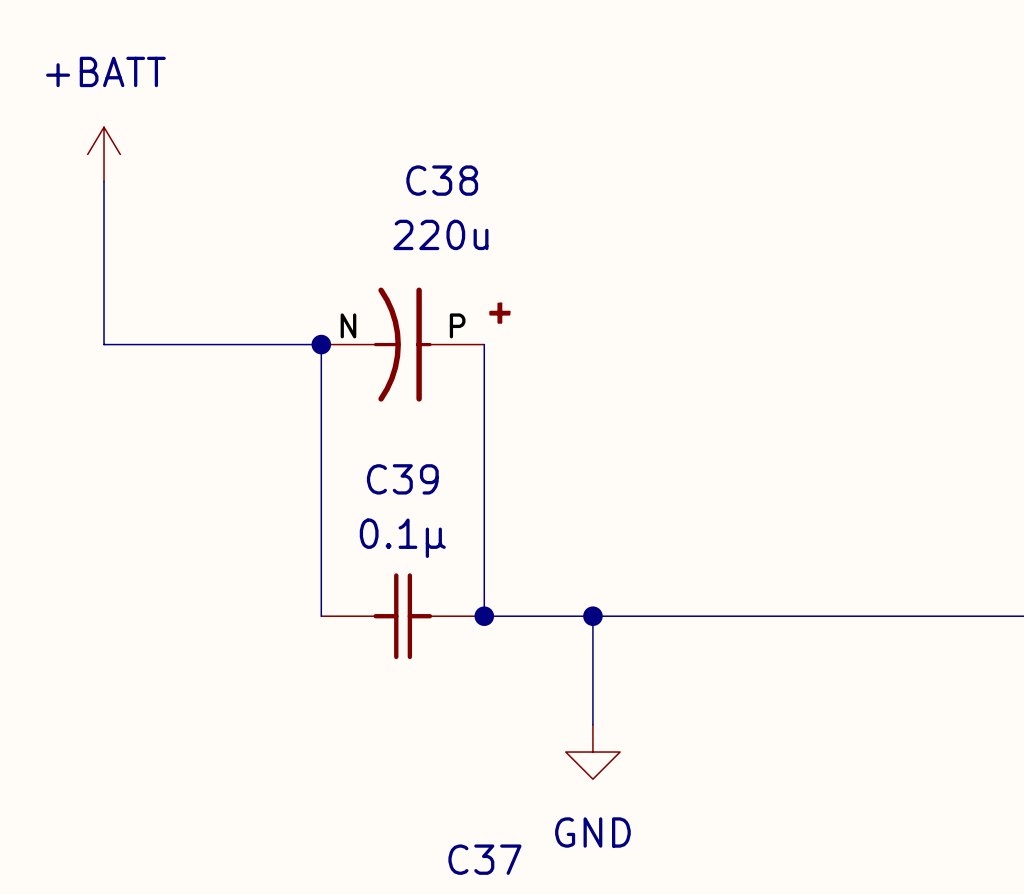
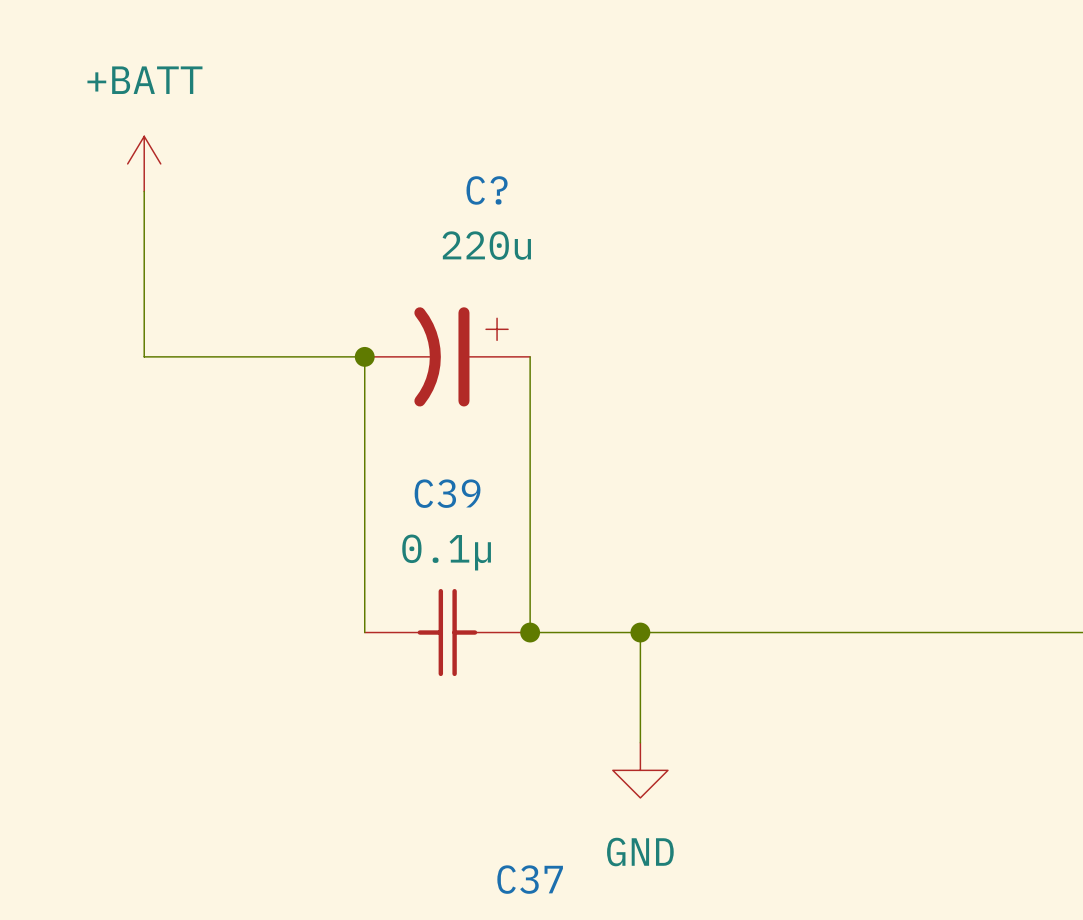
C?: none -> 220u (447, 356)
C38: 220u (415, 344) -> none

